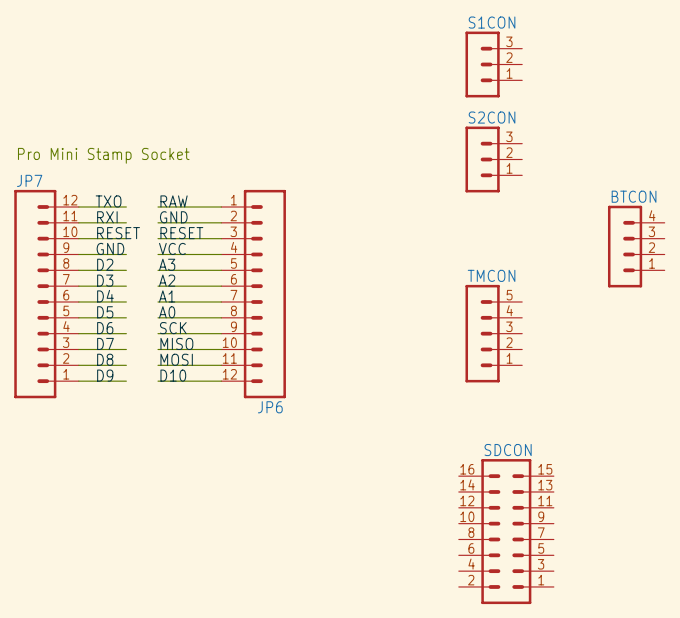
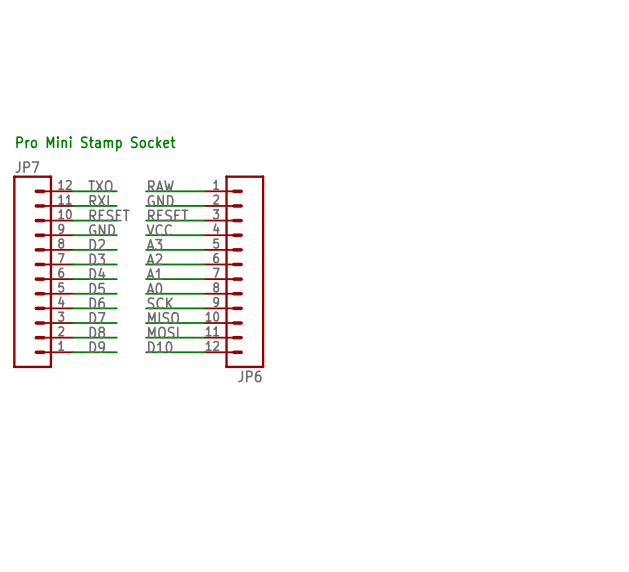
S1CON: (493, 64) -> none
S2CON: (493, 159) -> none
BTCON: (636, 246) -> none
TMCON: (493, 333) -> none
SDCON: (506, 531) -> none

